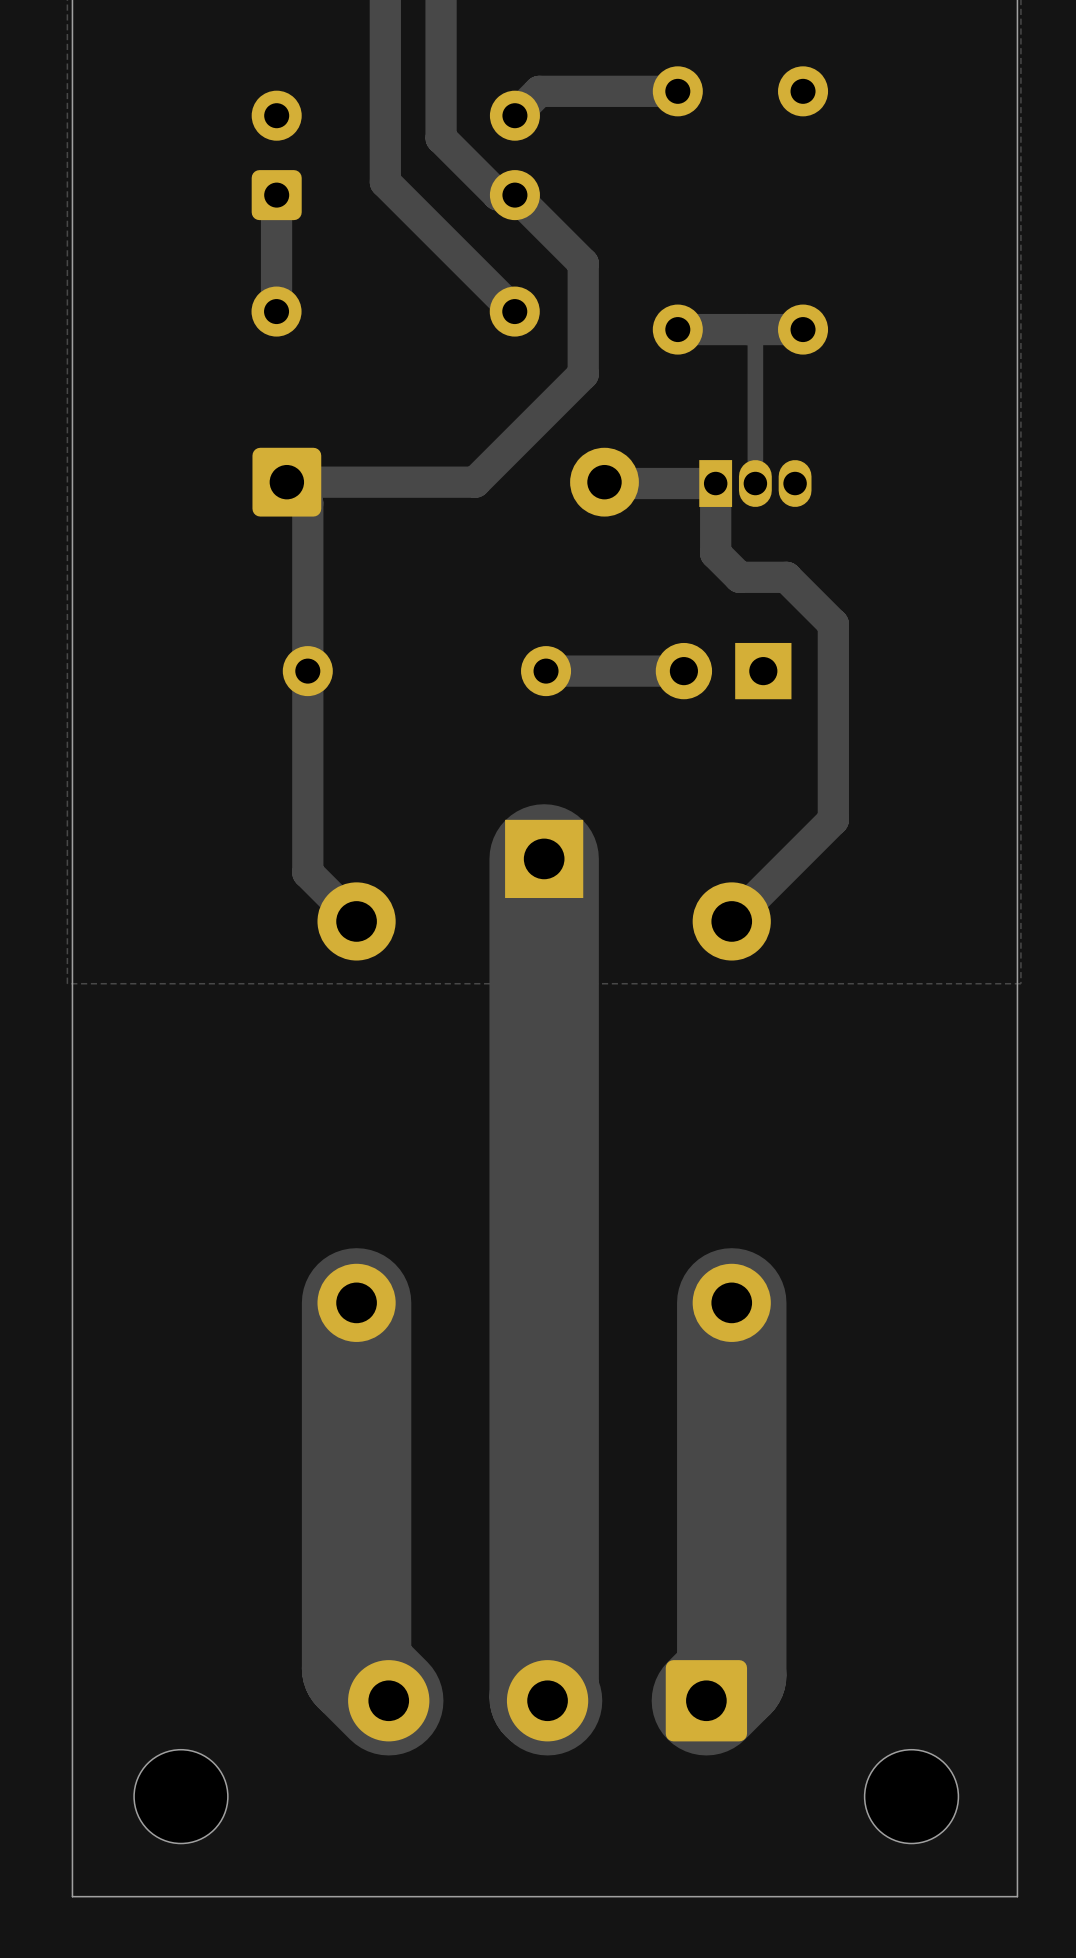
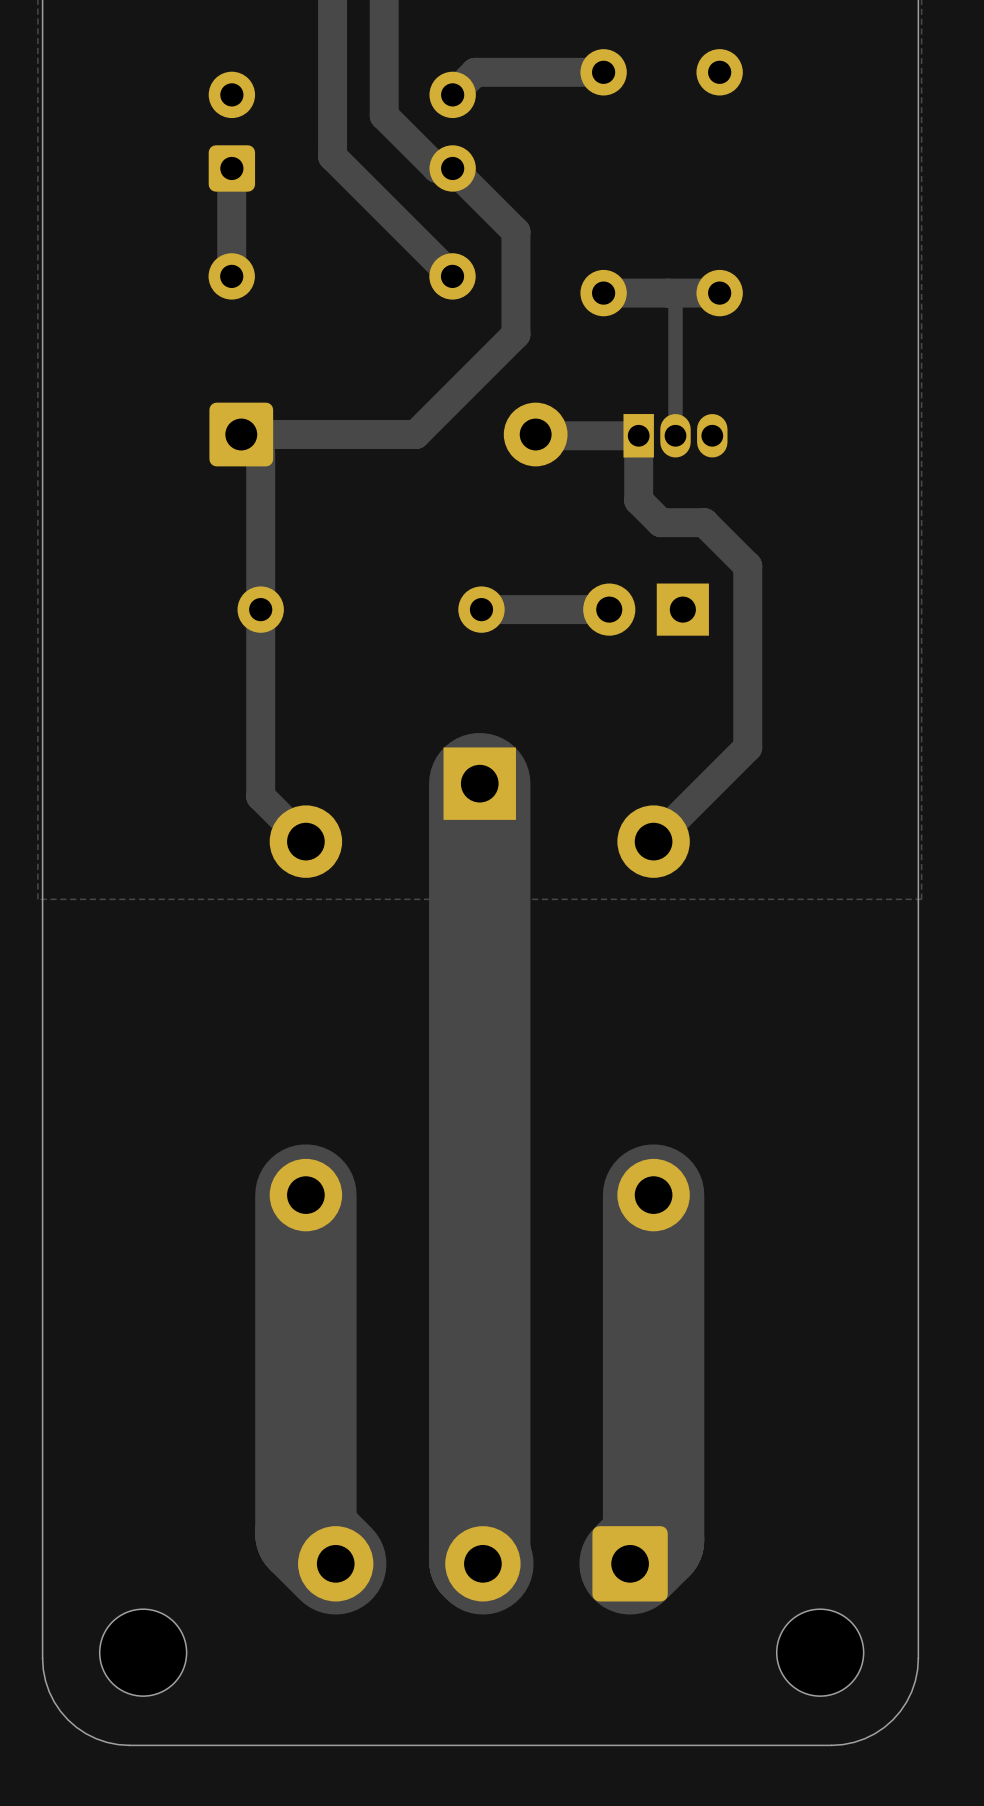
board edge: (72, 1802) (72, 1896) (166, 1896) -> (42, 1658) (49, 1691) (68, 1719) (96, 1738) (129, 1745)
board edge: (1017, 1802) (1017, 1896) (923, 1896) -> (918, 1658) (911, 1691) (892, 1719) (864, 1738) (831, 1745)

